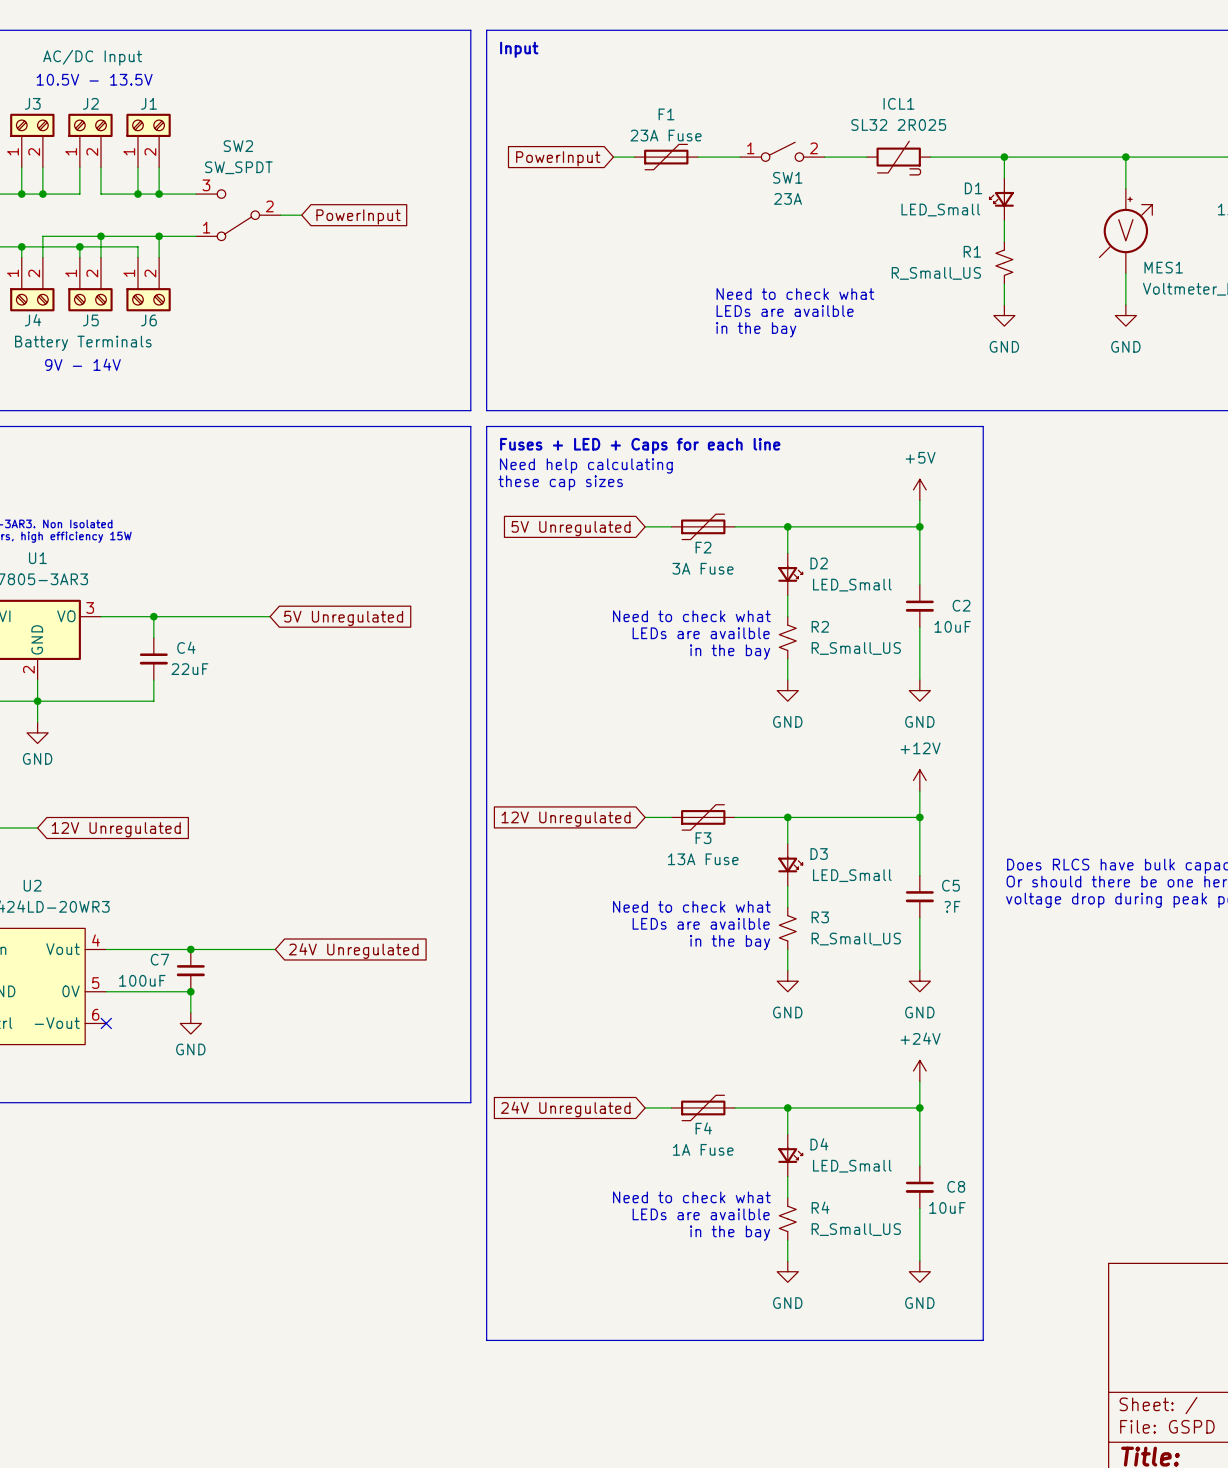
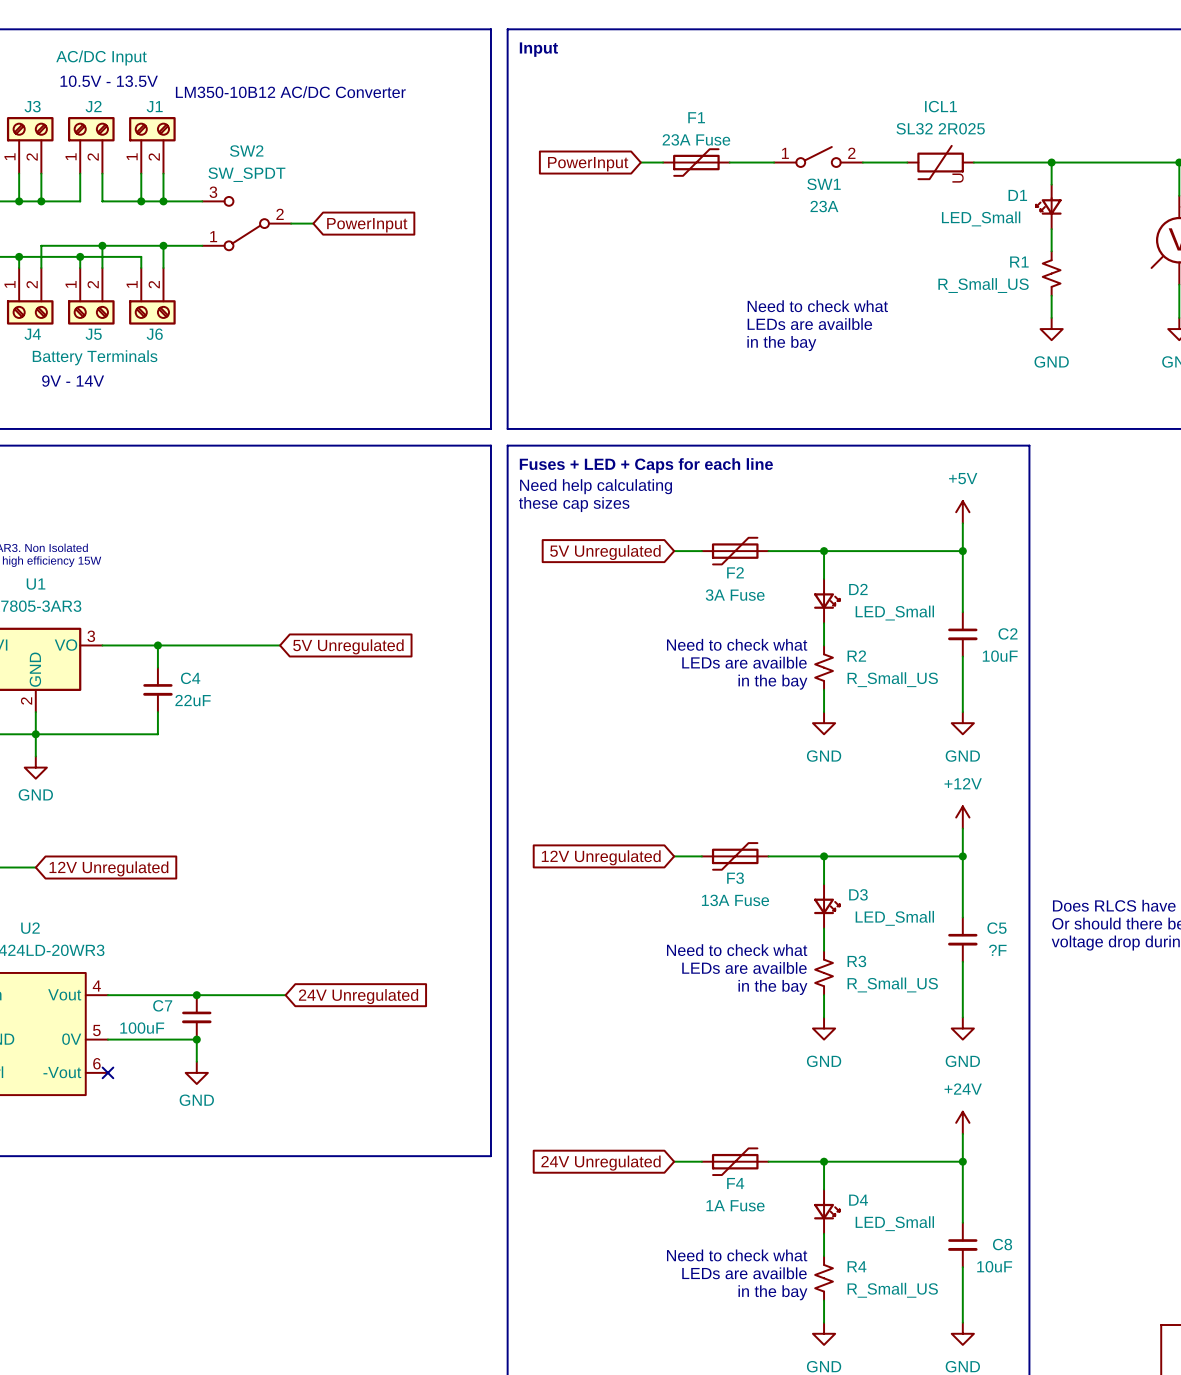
text: none -> LM350-10B12 AC/DC Converter (290, 92)

